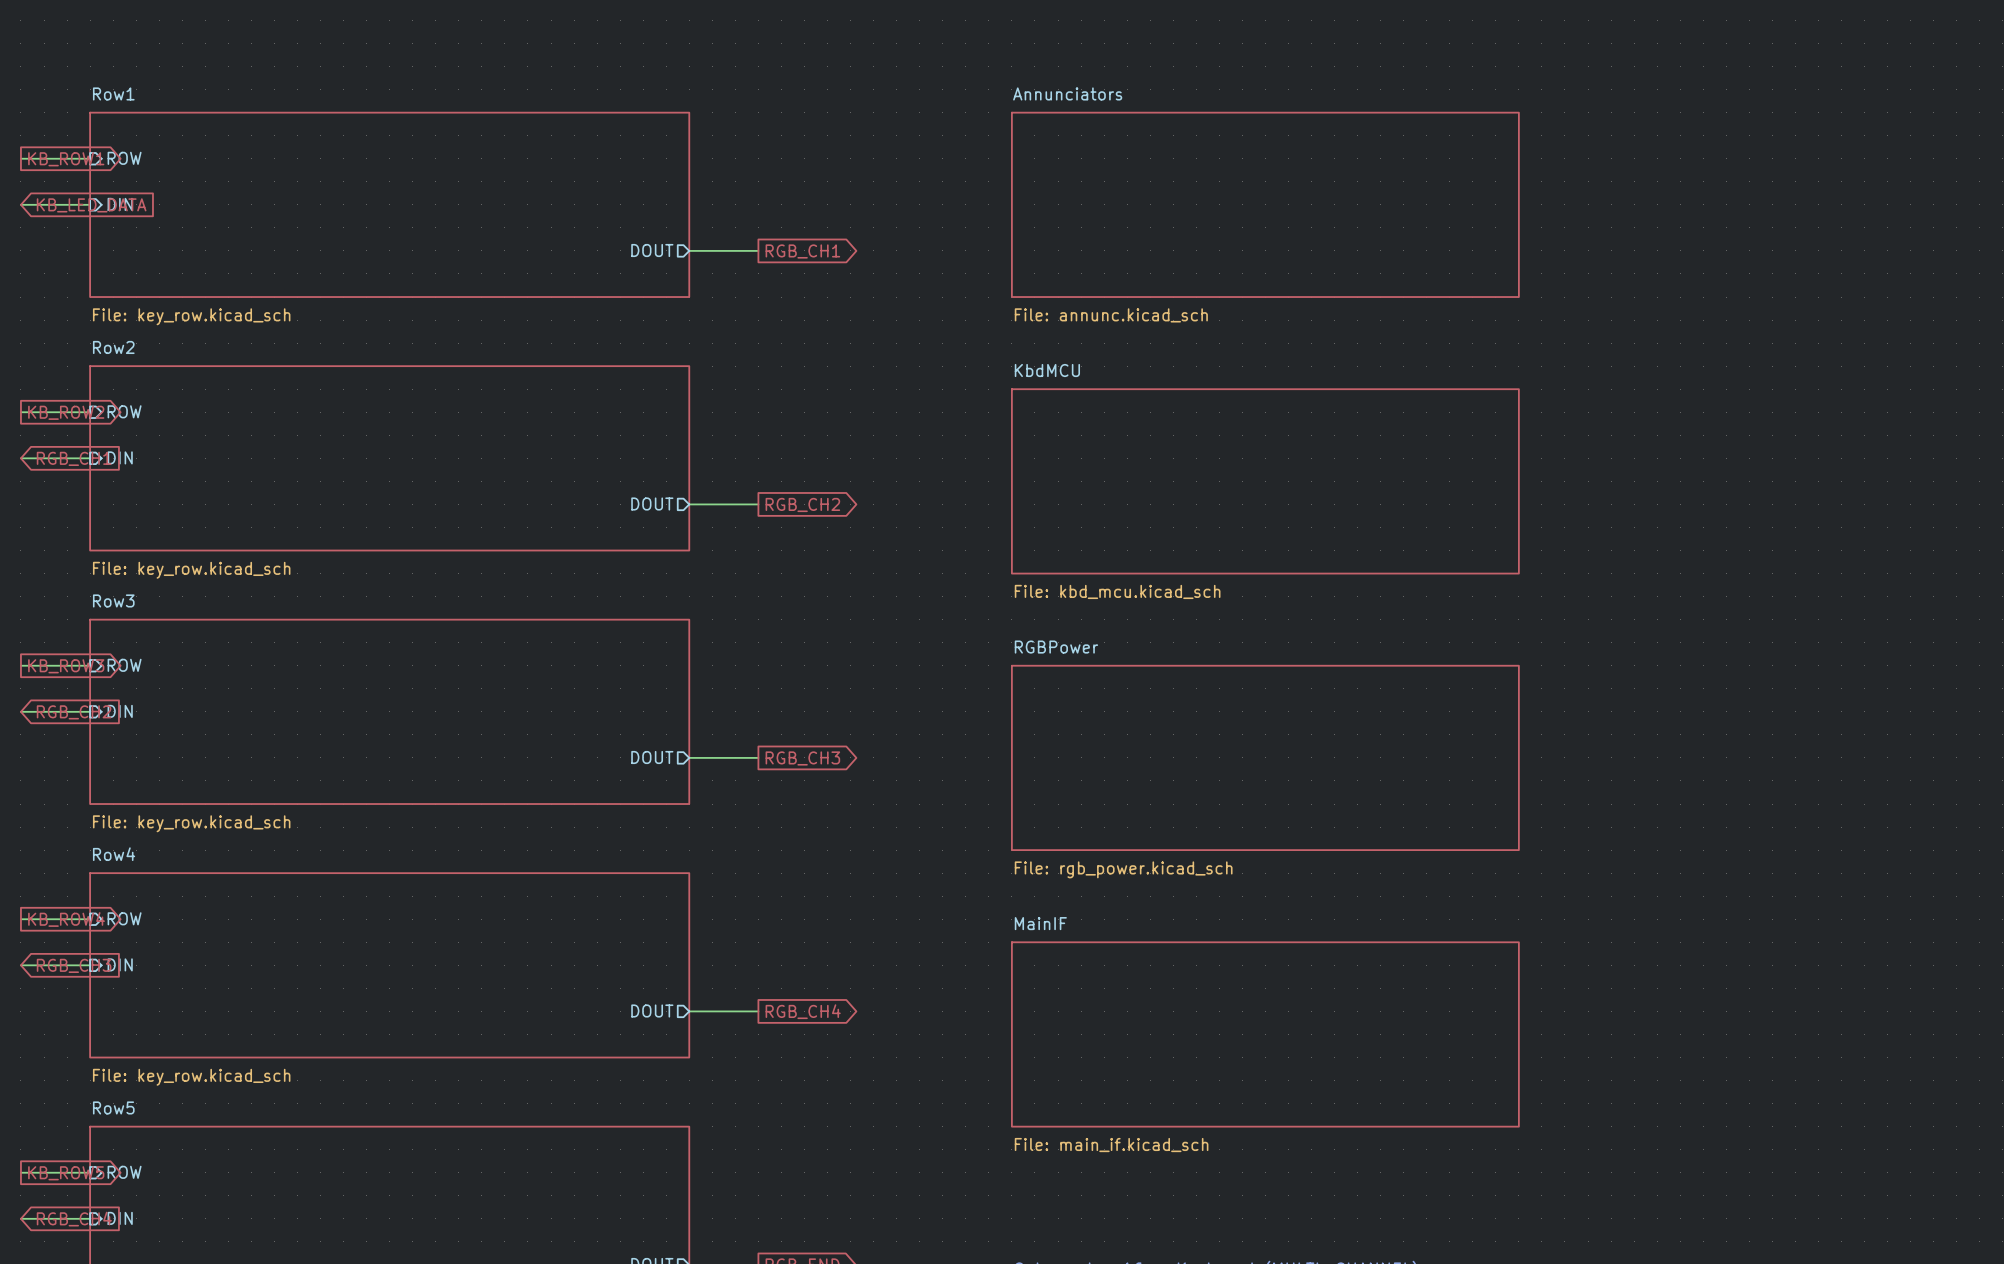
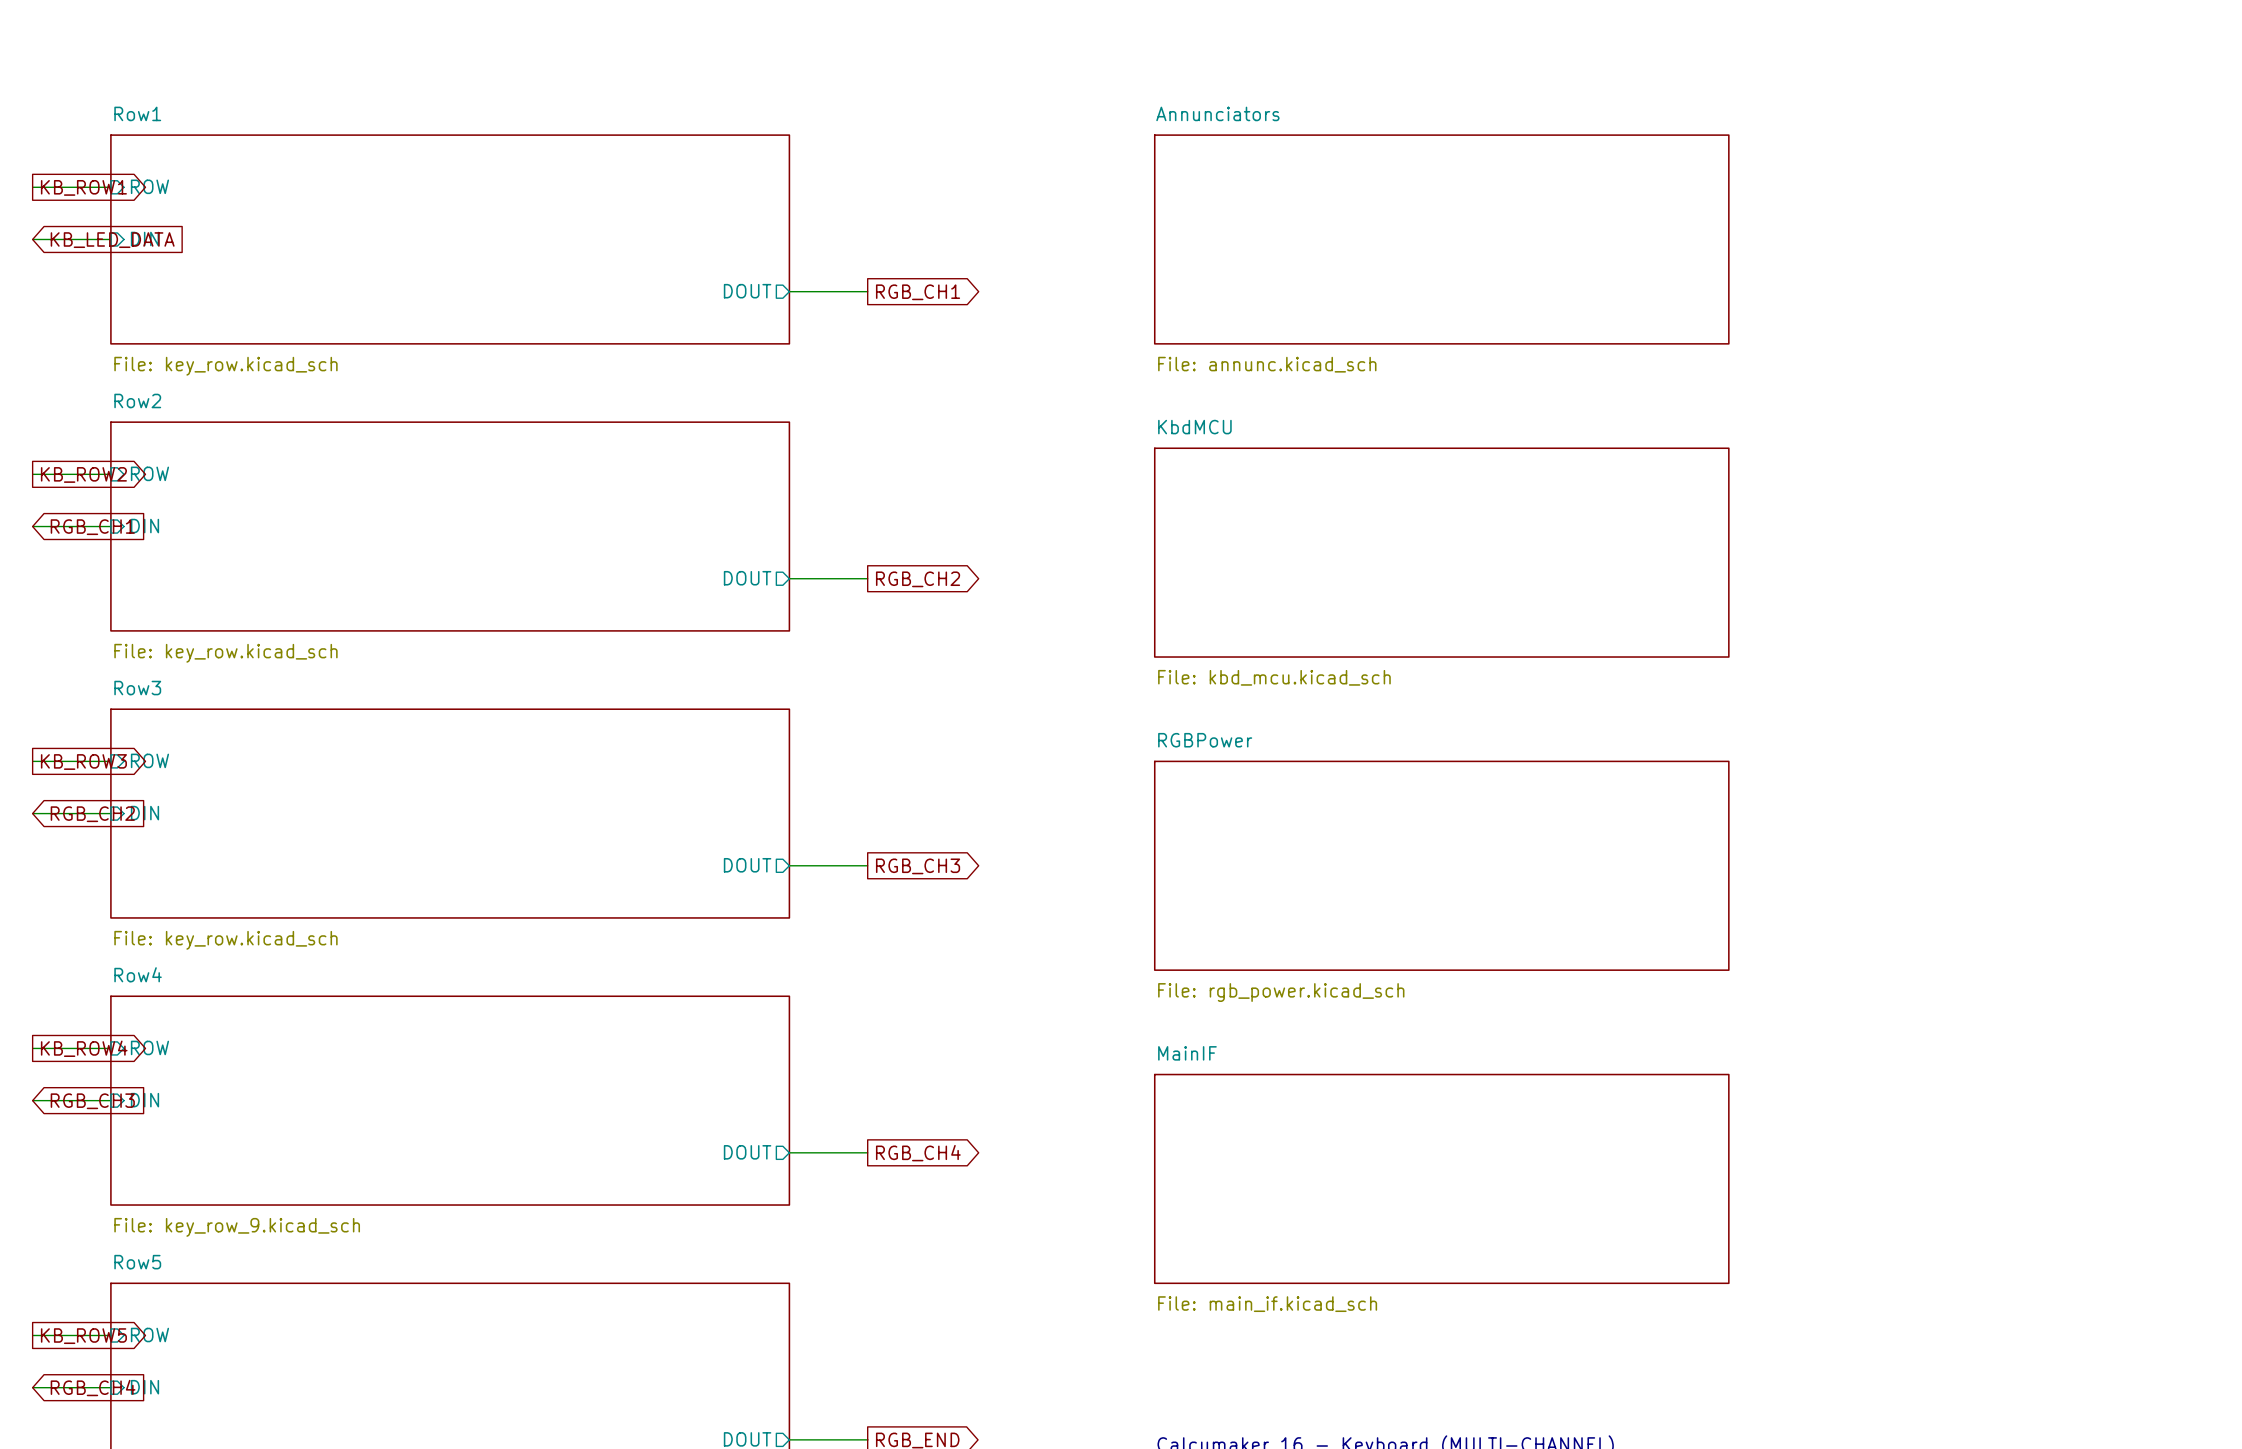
sheet Row4 value: File: key_row.kicad_sch (191, 1077) -> File: key_row_9.kicad_sch (237, 1227)

